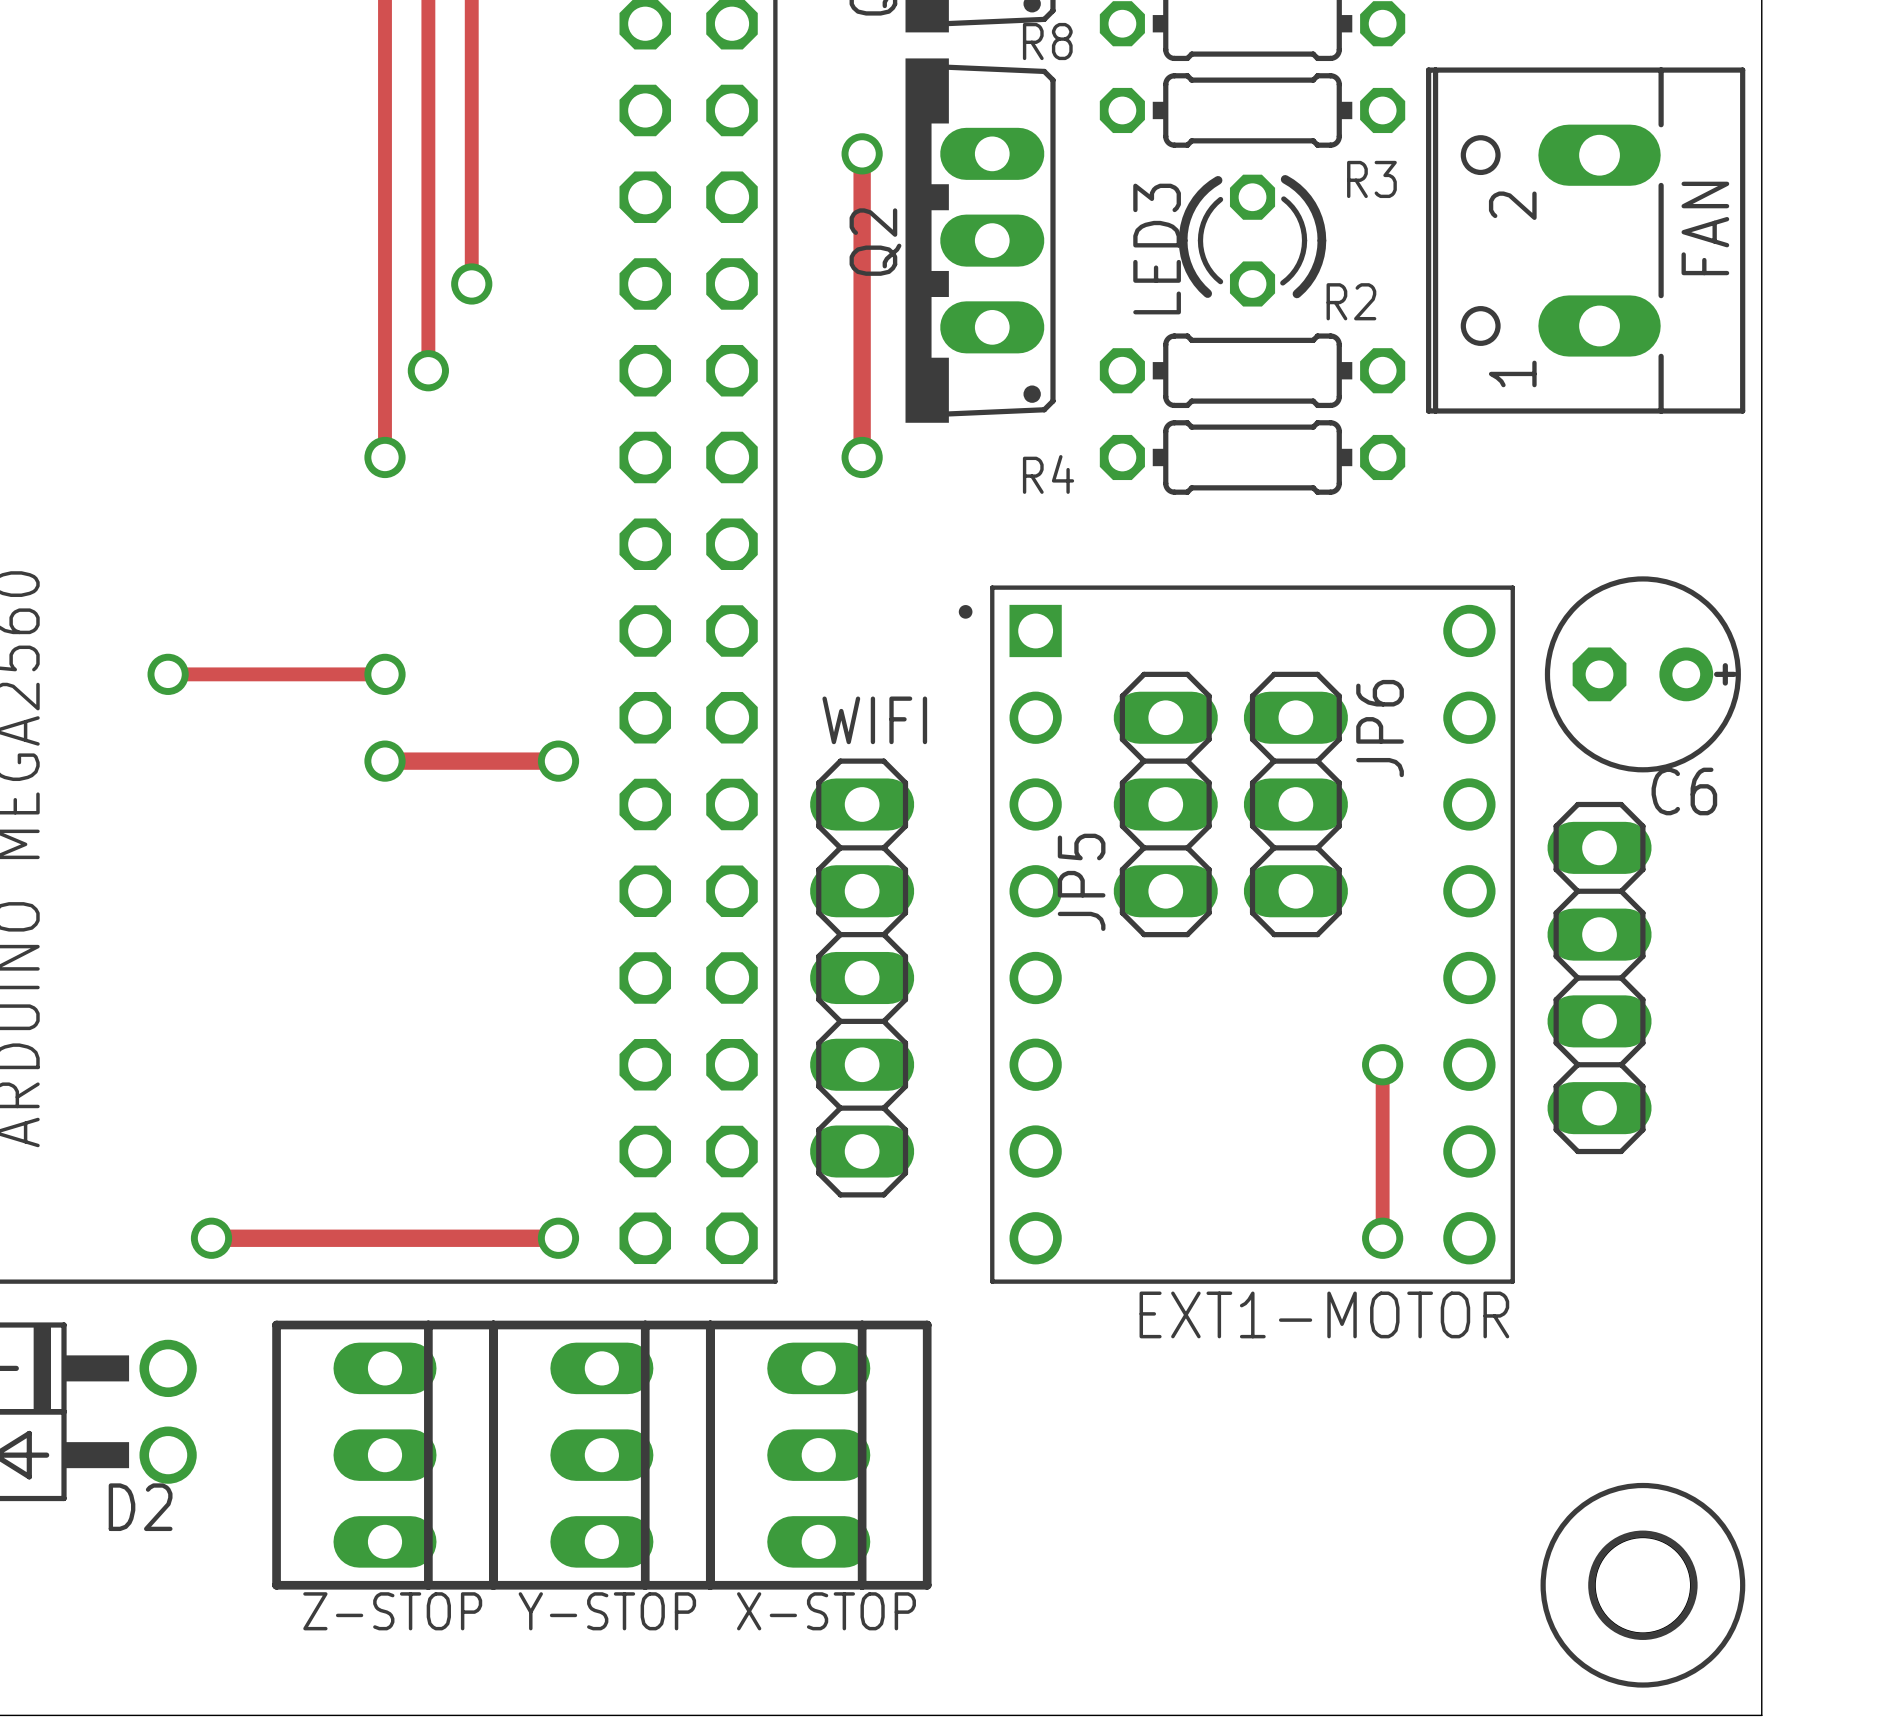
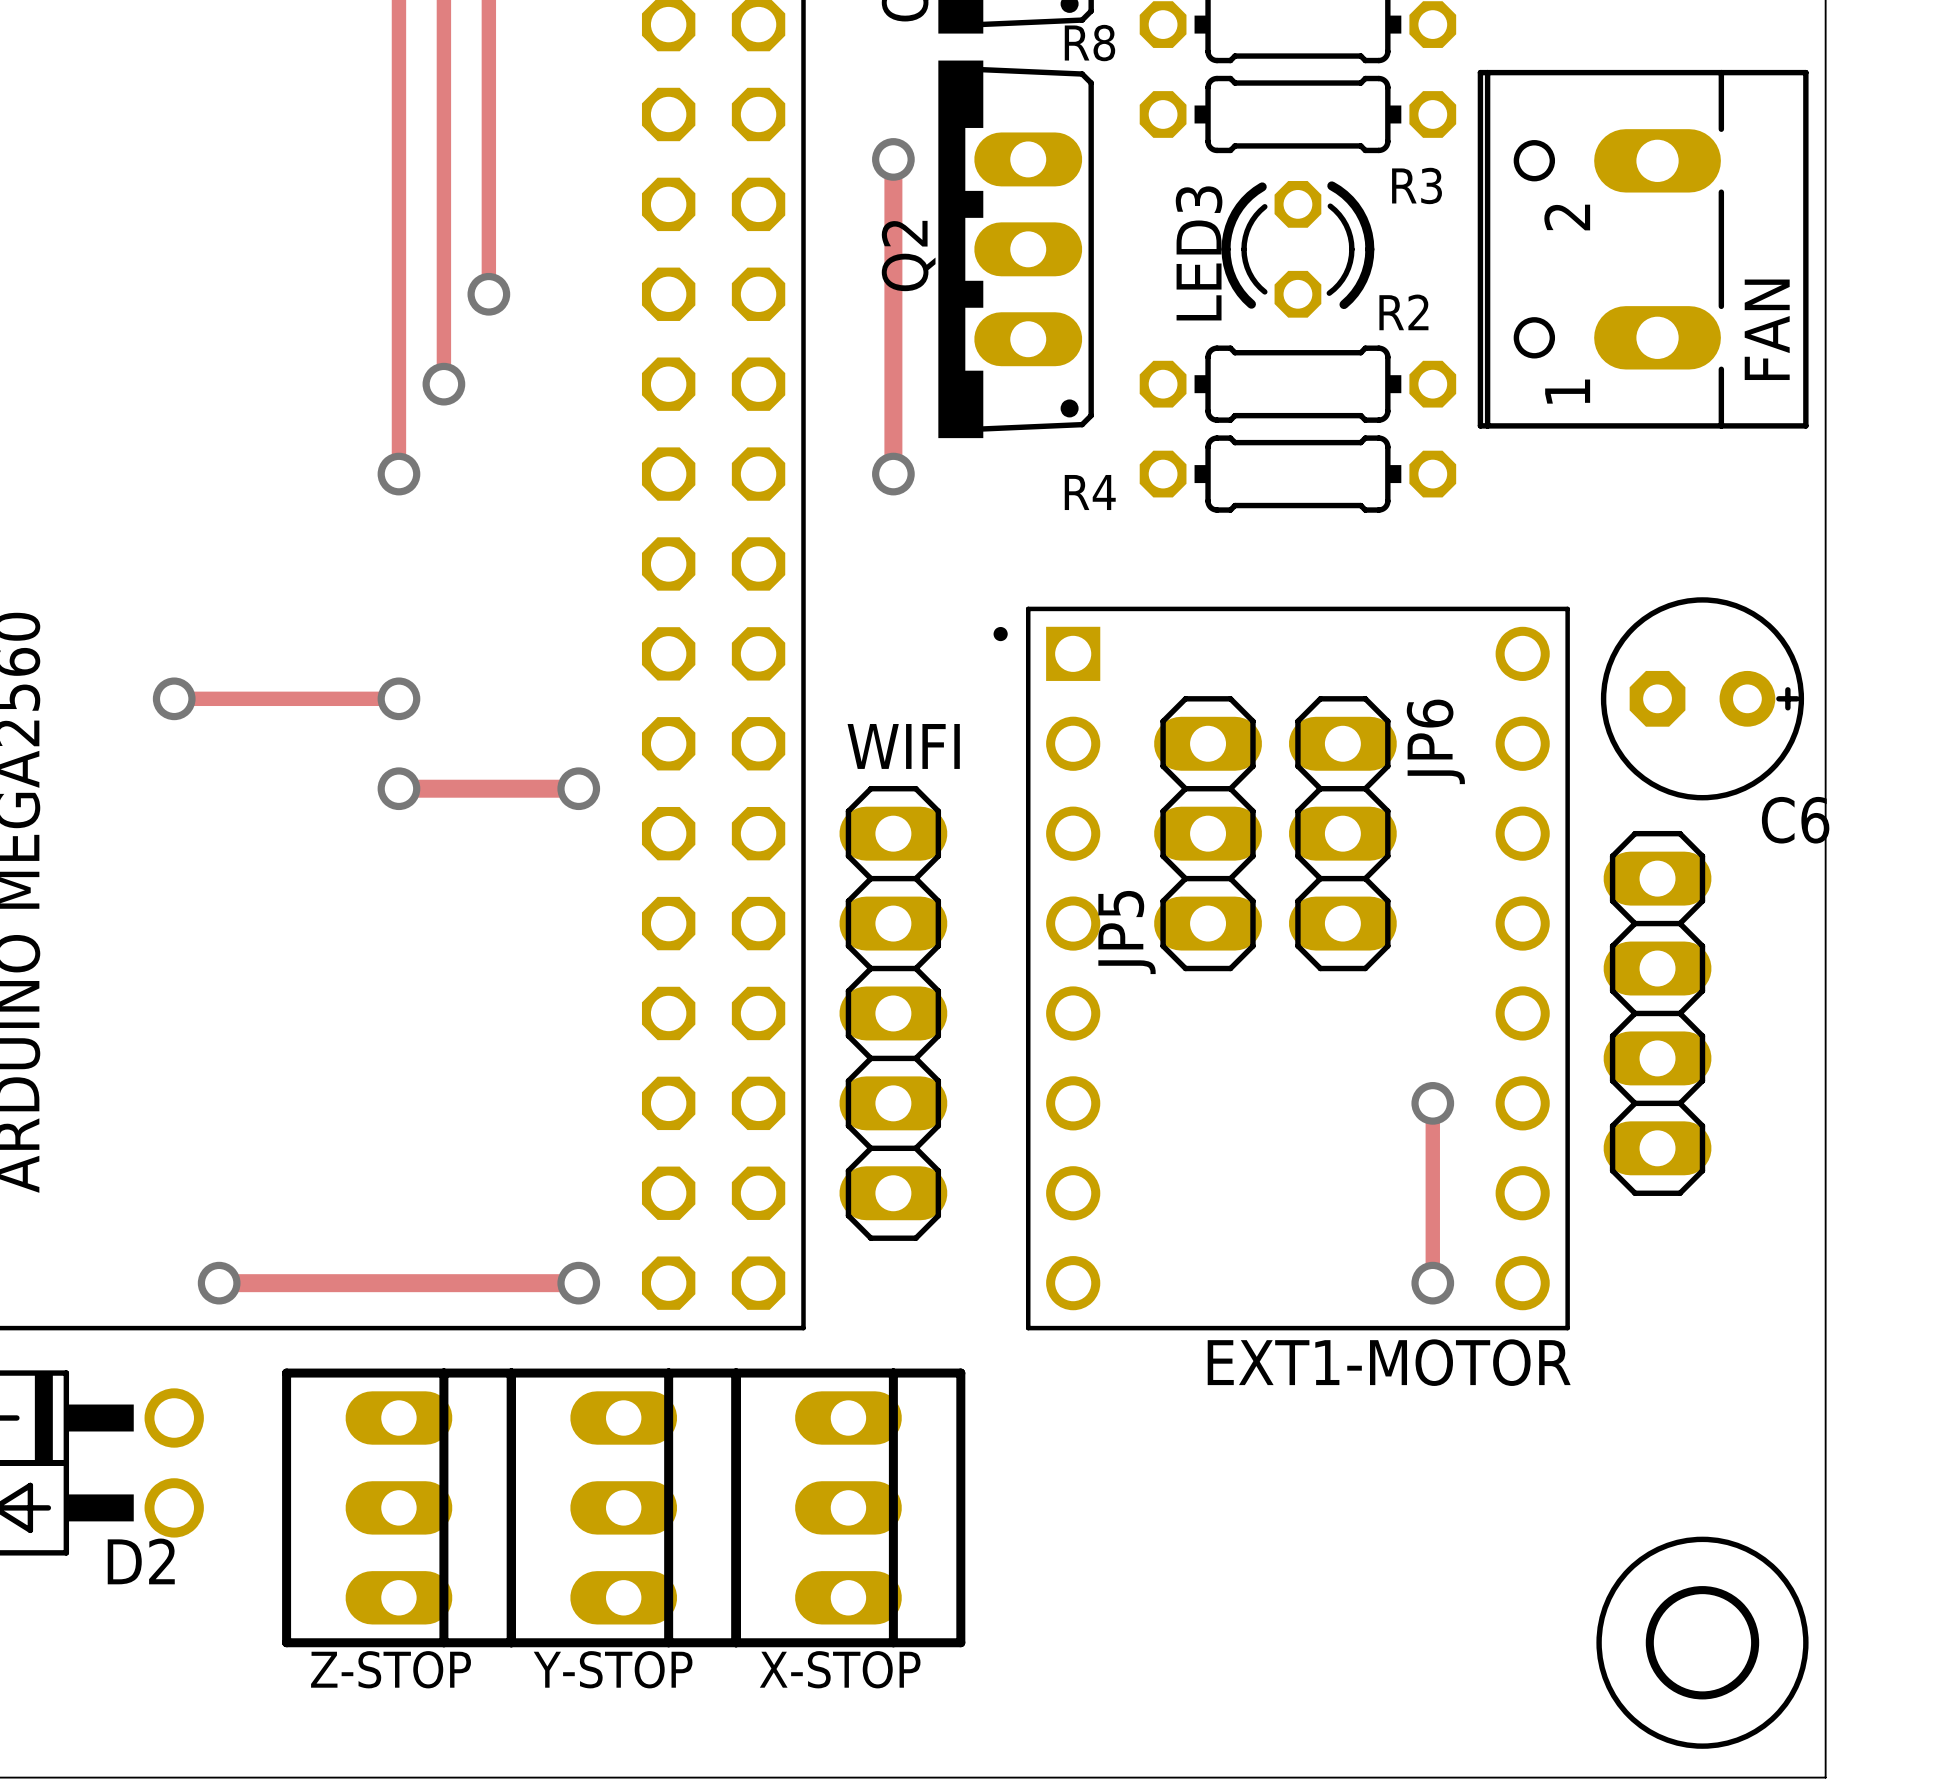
FAN name position: FAN (1705, 228) -> FAN (1767, 329)
C6 name position: C6 (1684, 791) -> C6 (1795, 820)

